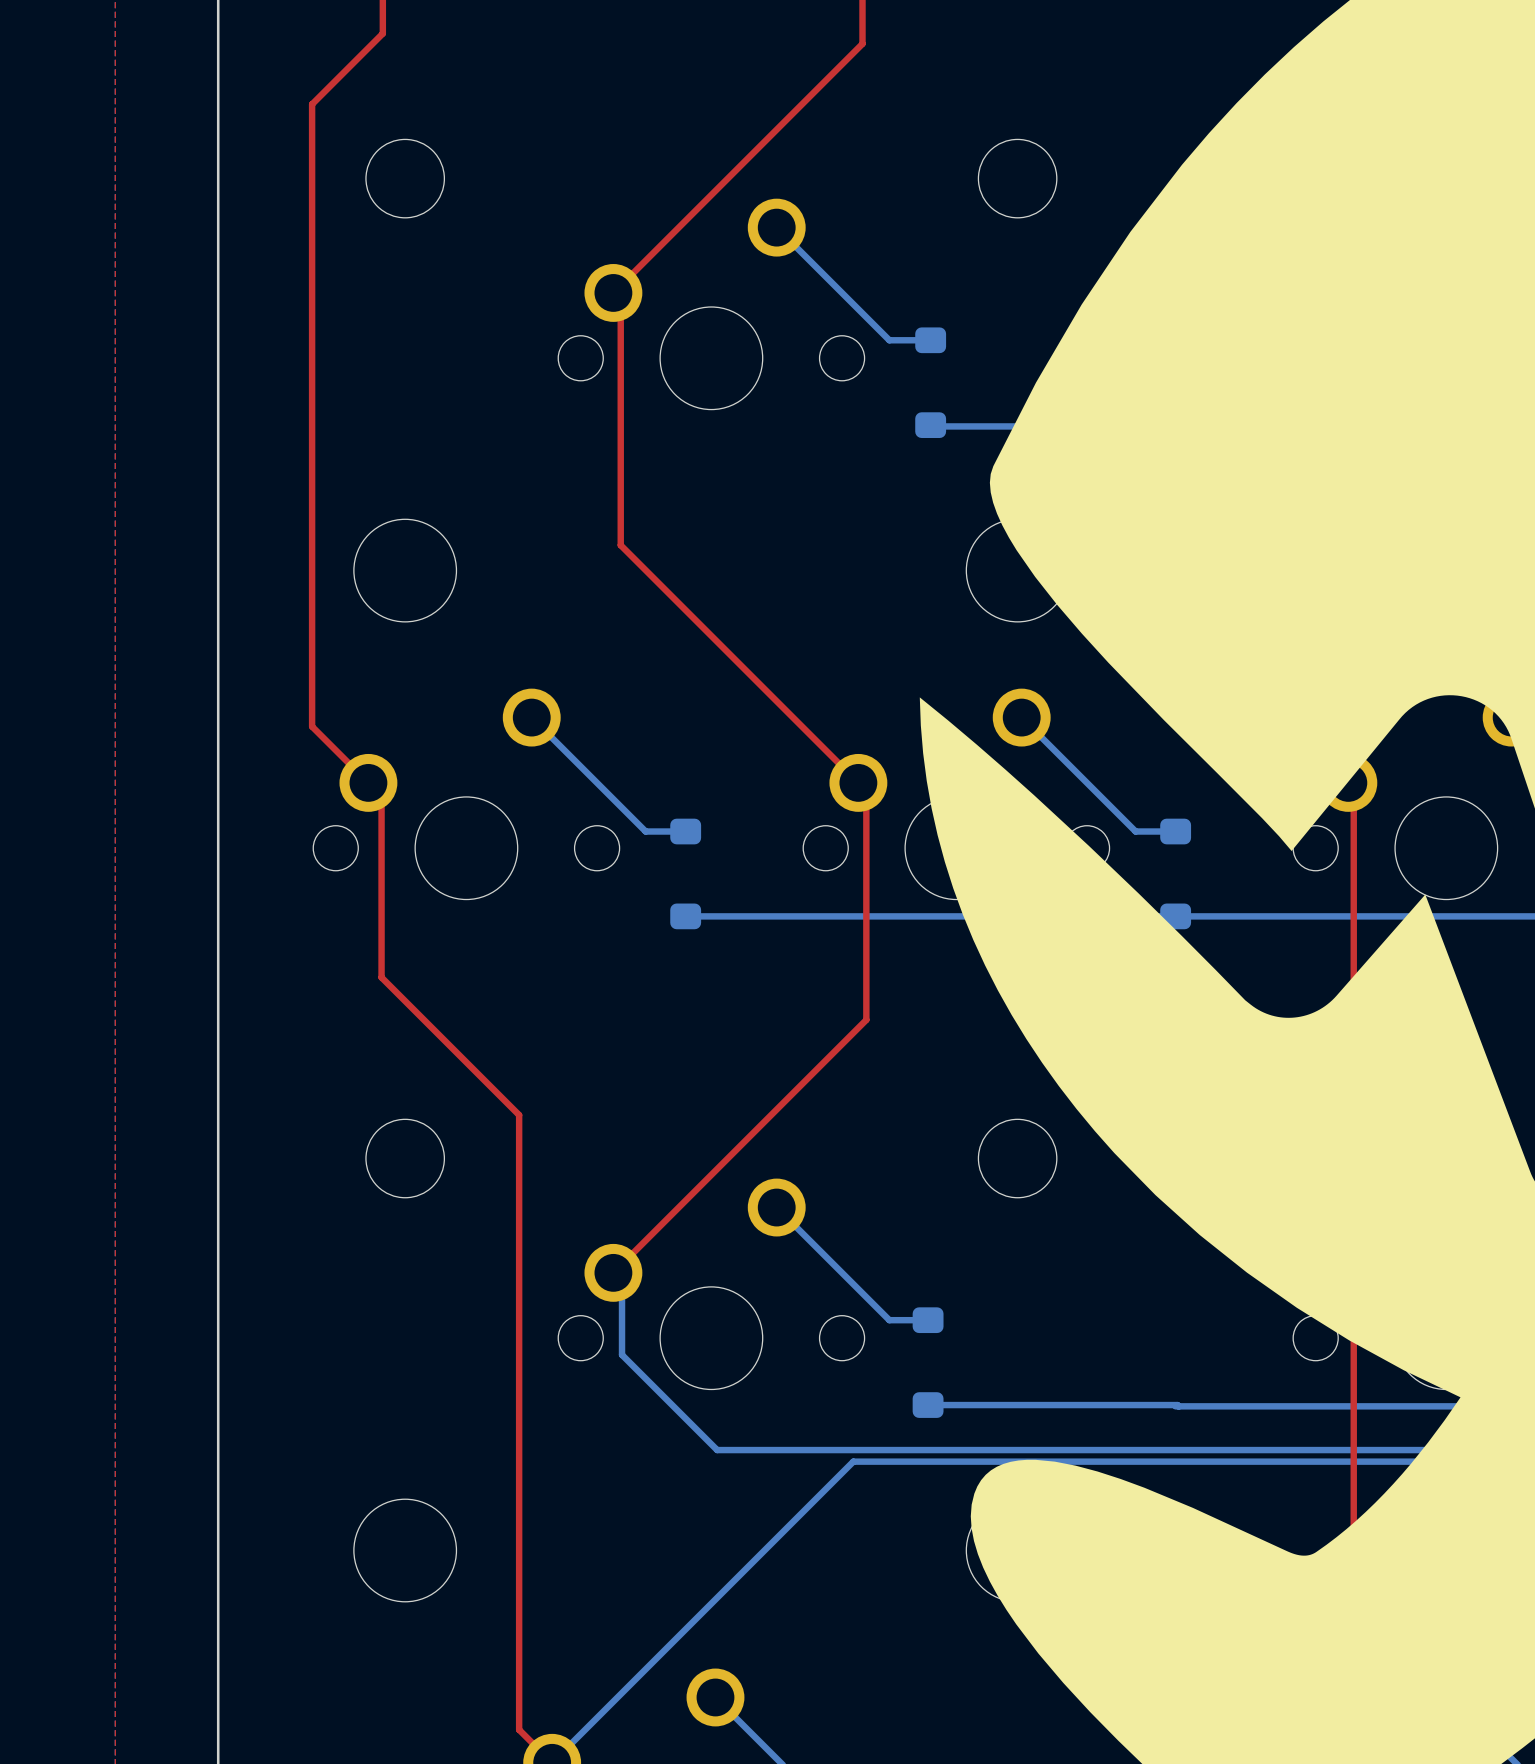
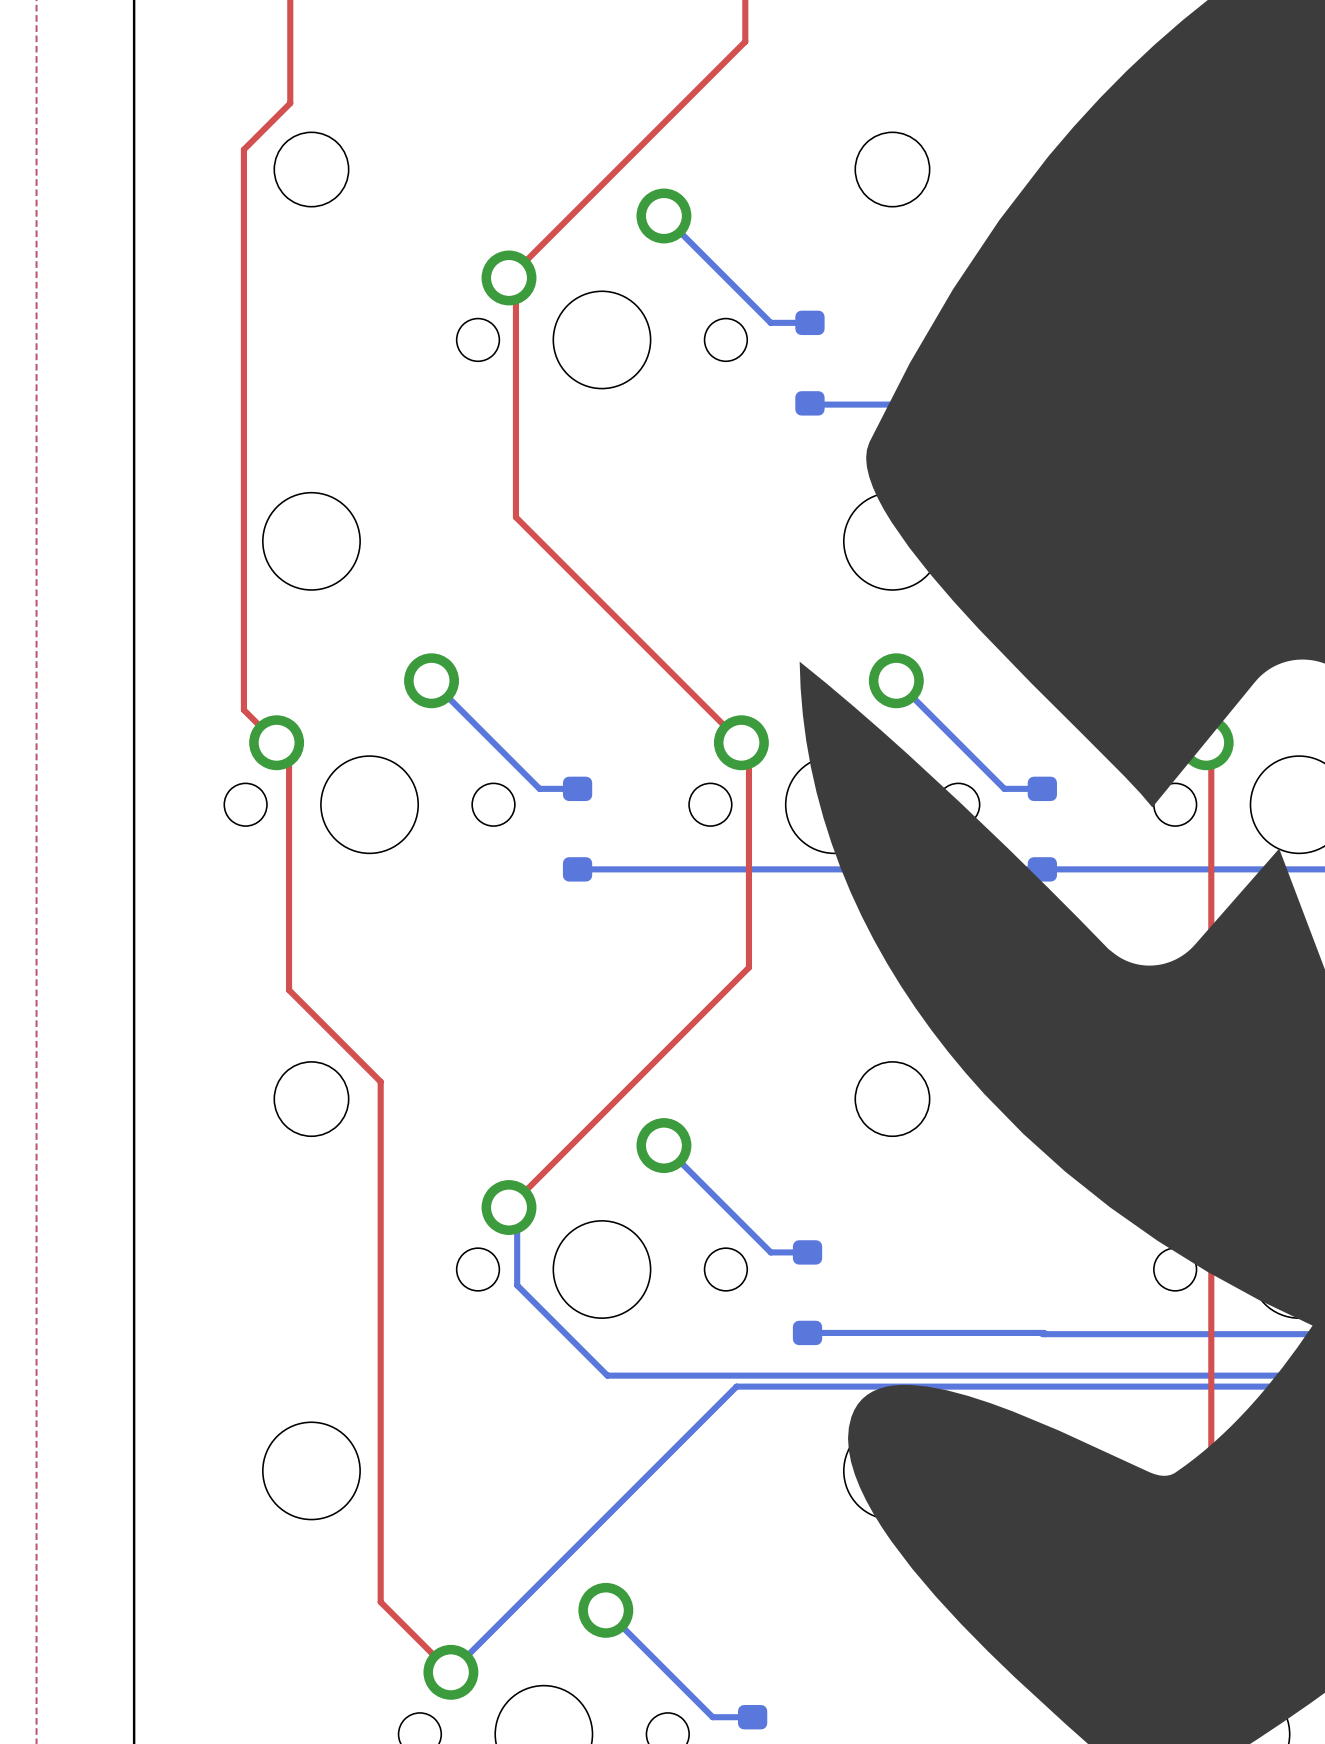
top track: (382, 33) (312, 104) (312, 726) (333, 748) -> (290, 31) (290, 103) (243, 149) (243, 710)
top track: (381, 977) (519, 1115) (519, 1729) -> (289, 927) (289, 990) (380, 1081) (380, 1602) (419, 1640)

